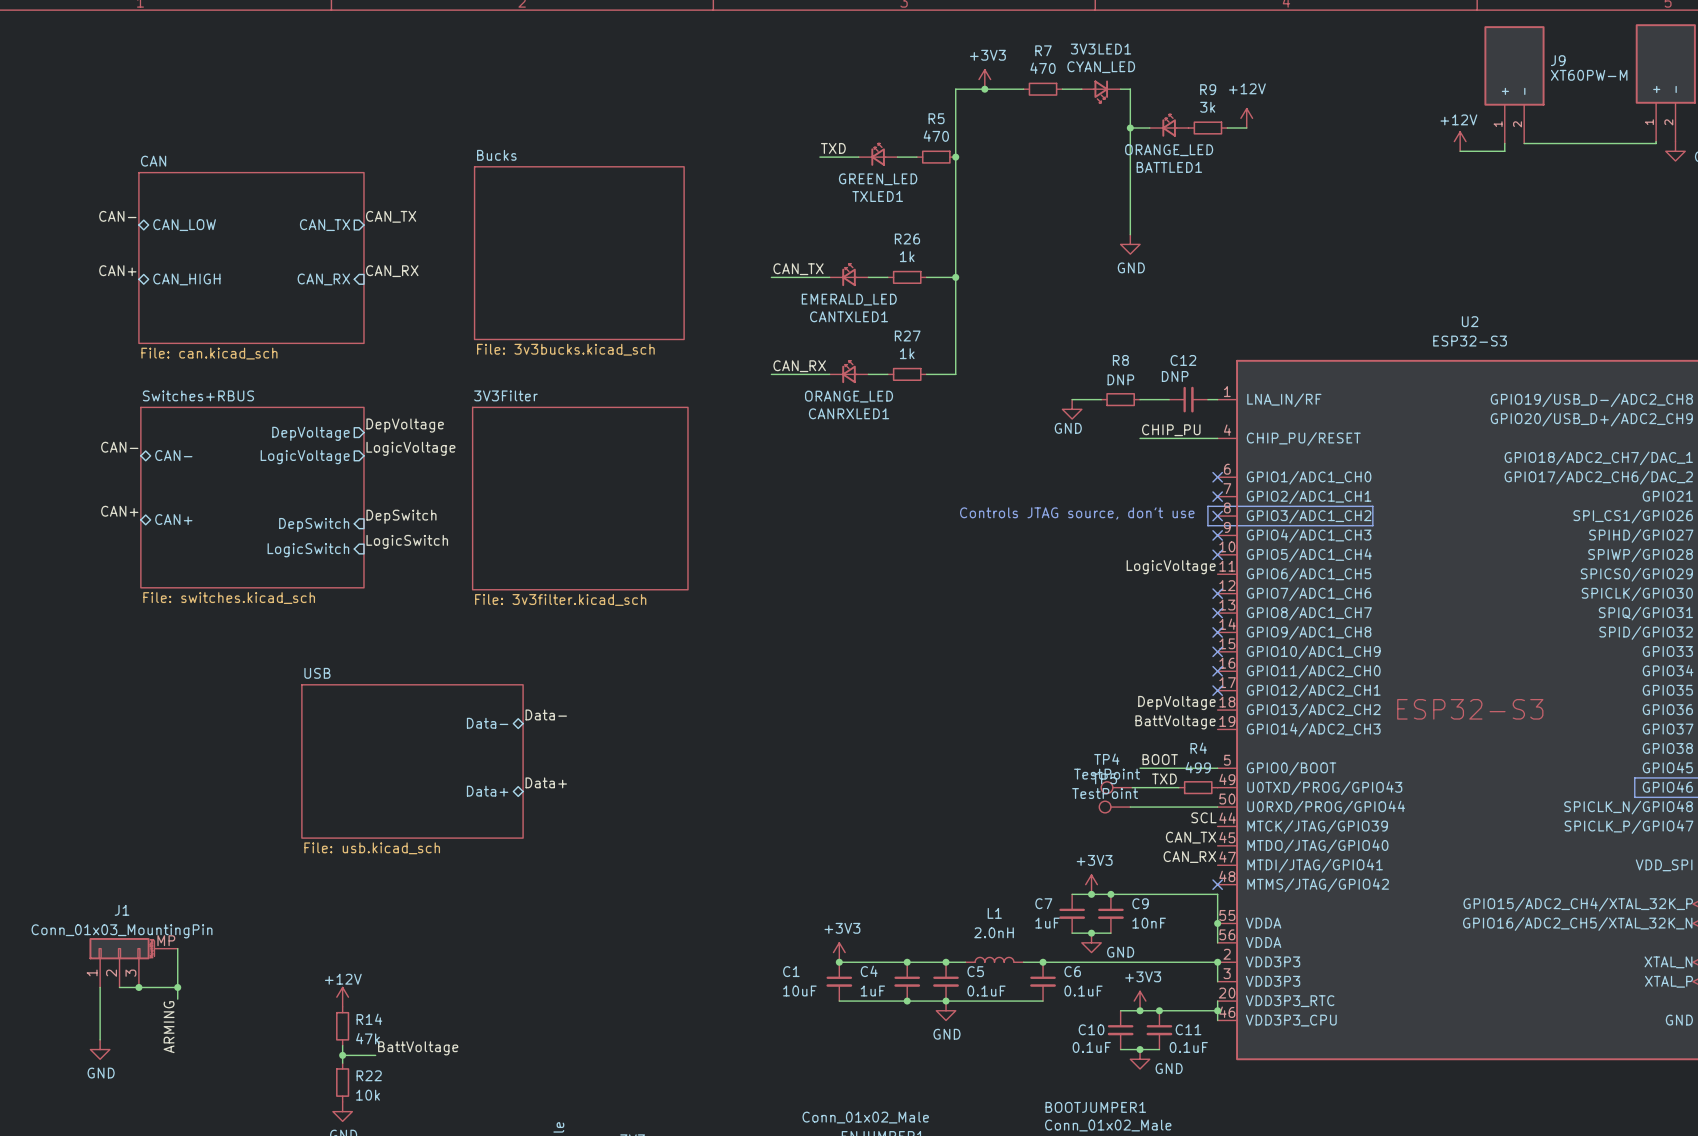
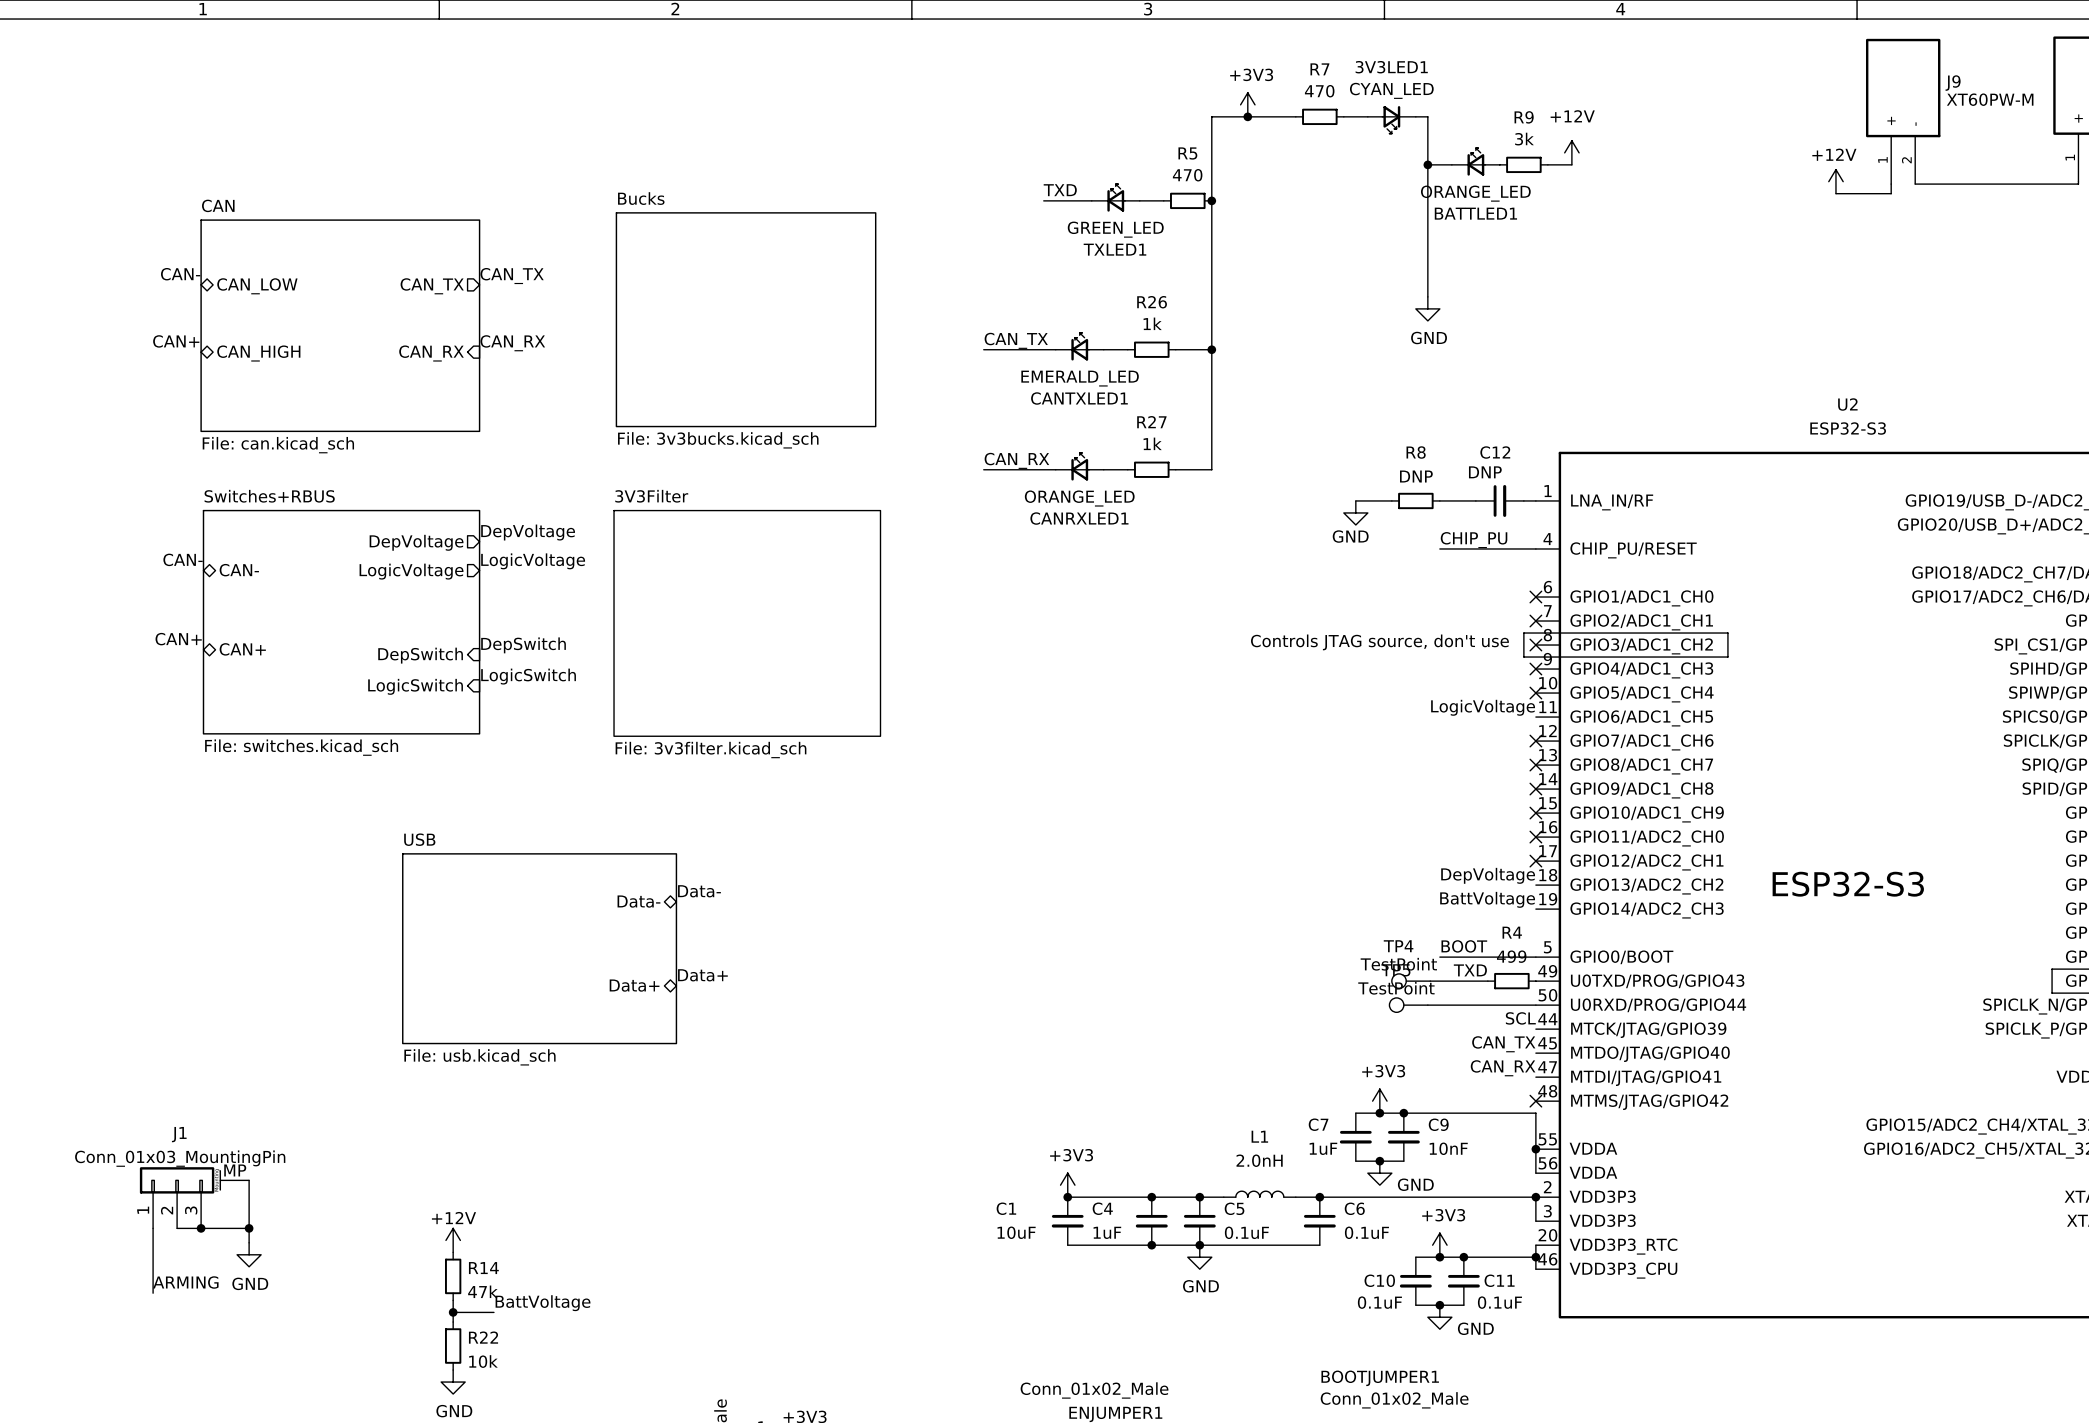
label rotation: 0° (169, 1027) -> 90° clockwise (185, 1282)
power symbol position: GND (100, 1049) -> GND (249, 1254)

